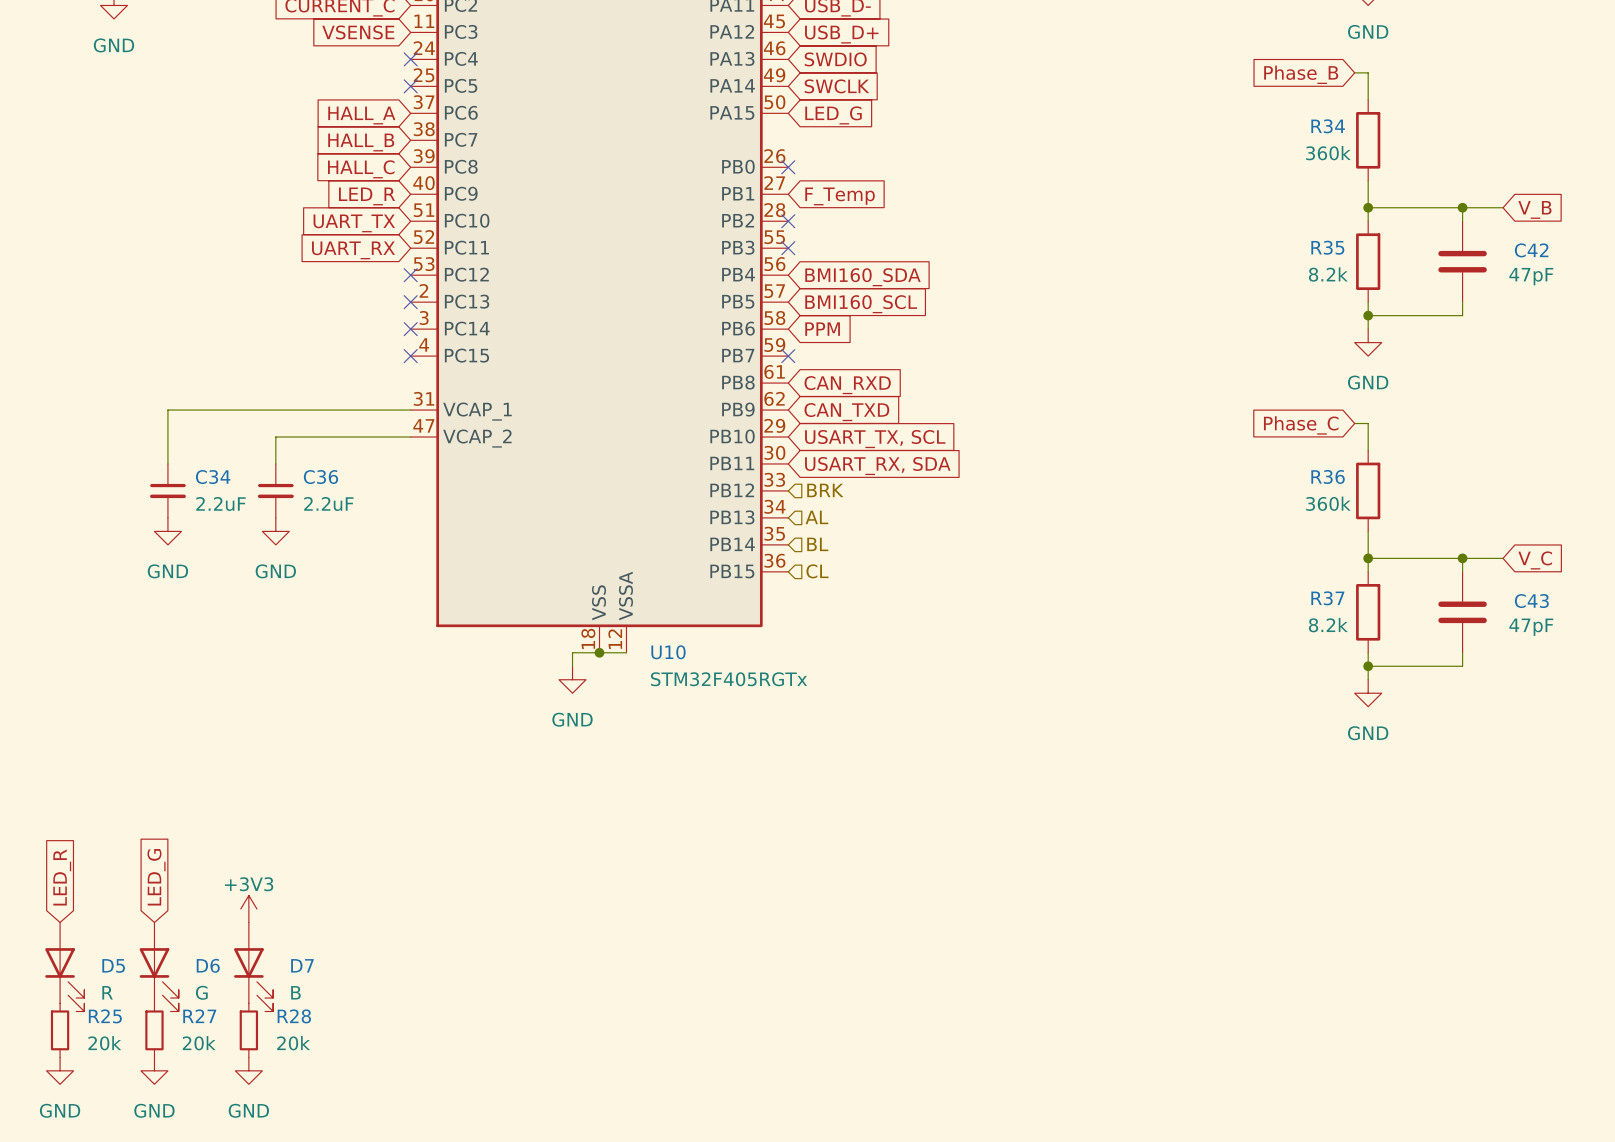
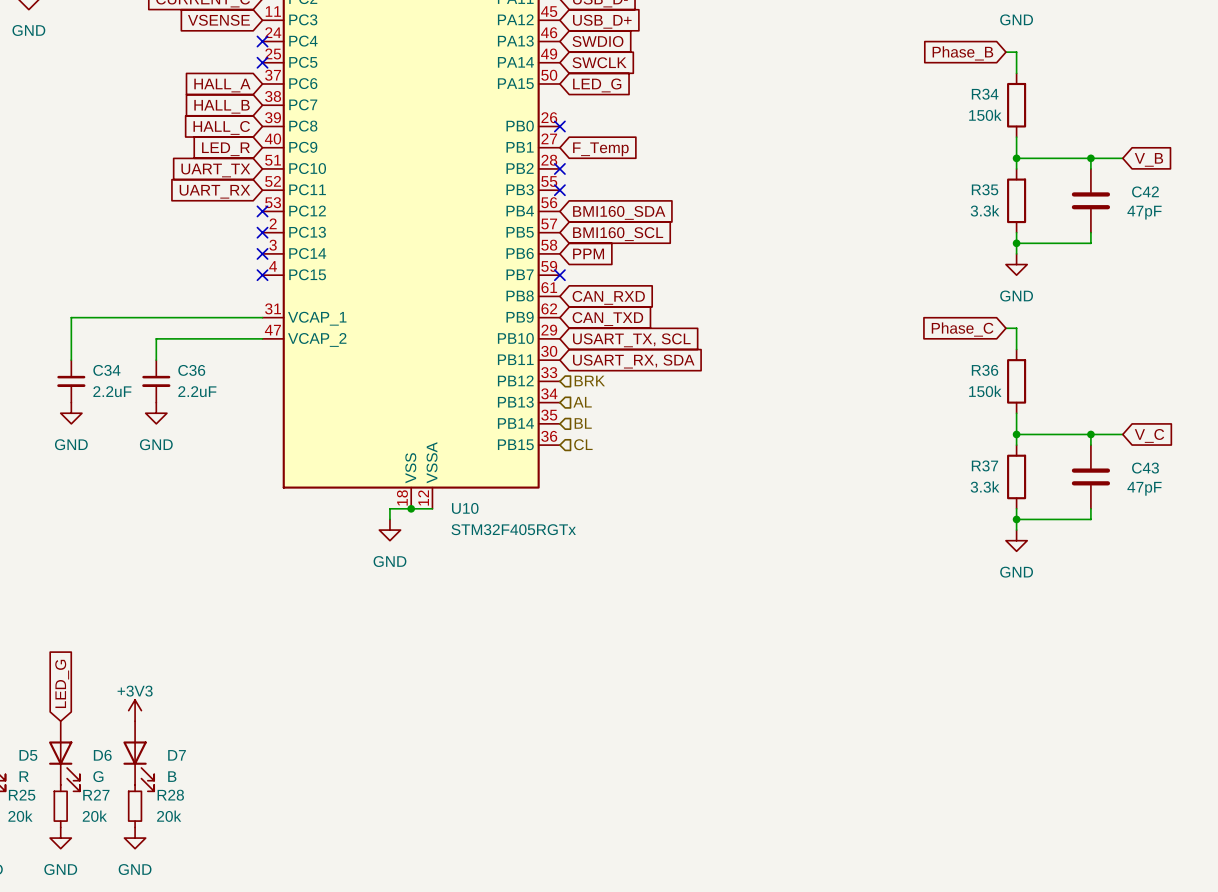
R34 value: 360k (1328, 153) -> 150k (985, 115)
R35 value: 8.2k (1328, 274) -> 3.3k (985, 210)
R36 value: 360k (1328, 503) -> 150k (985, 391)
R37 value: 8.2k (1328, 625) -> 3.3k (985, 486)

